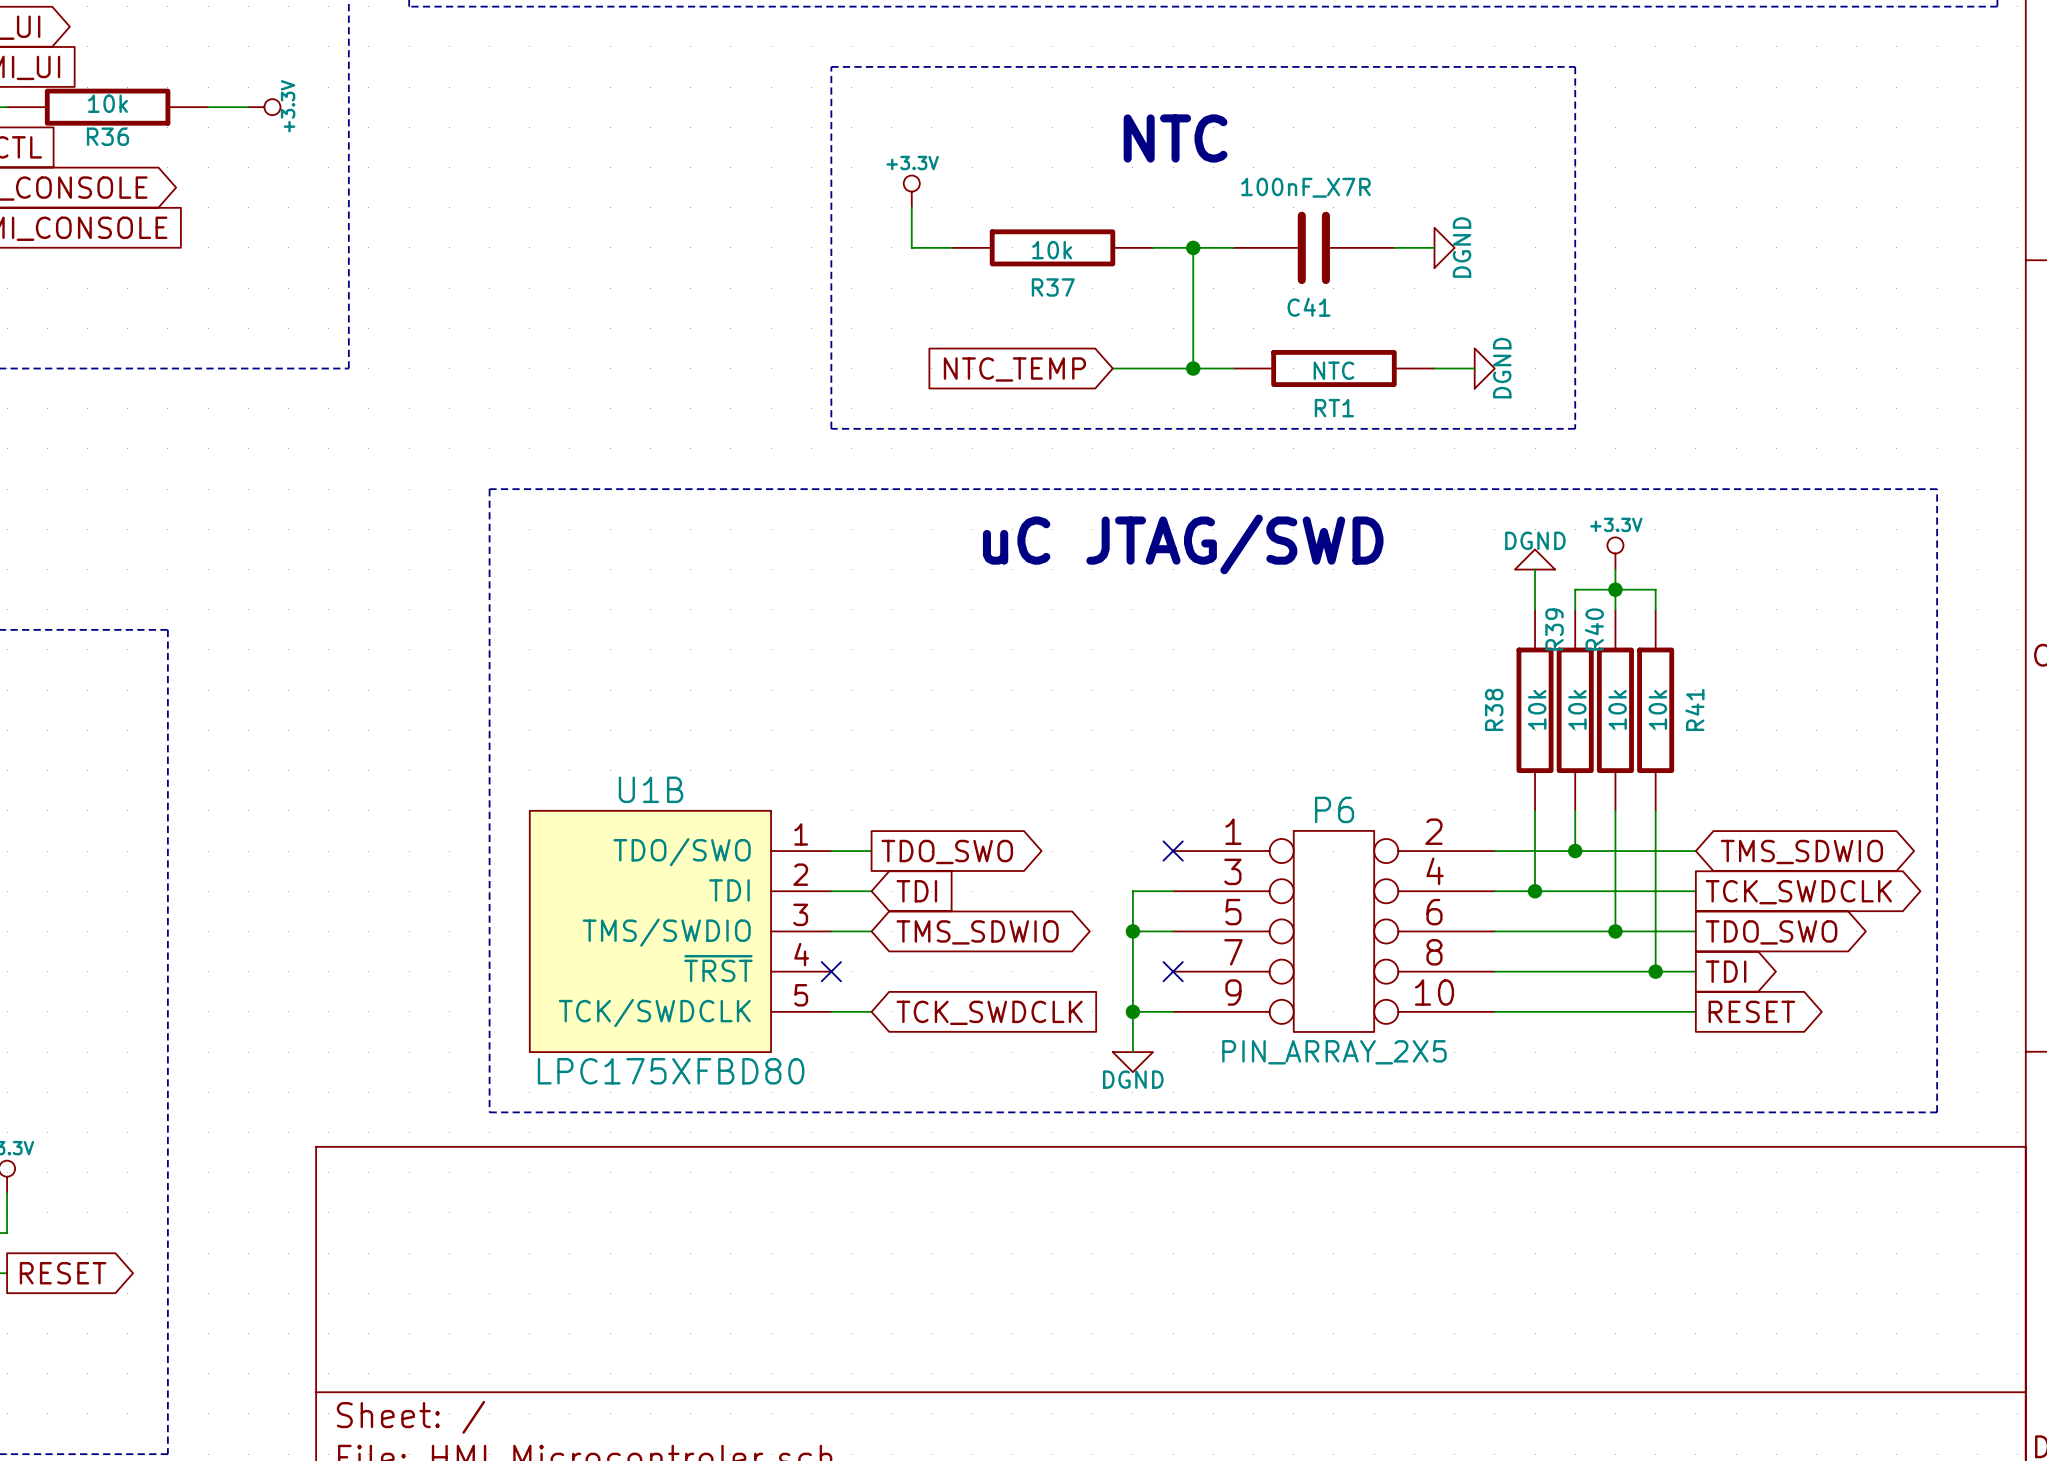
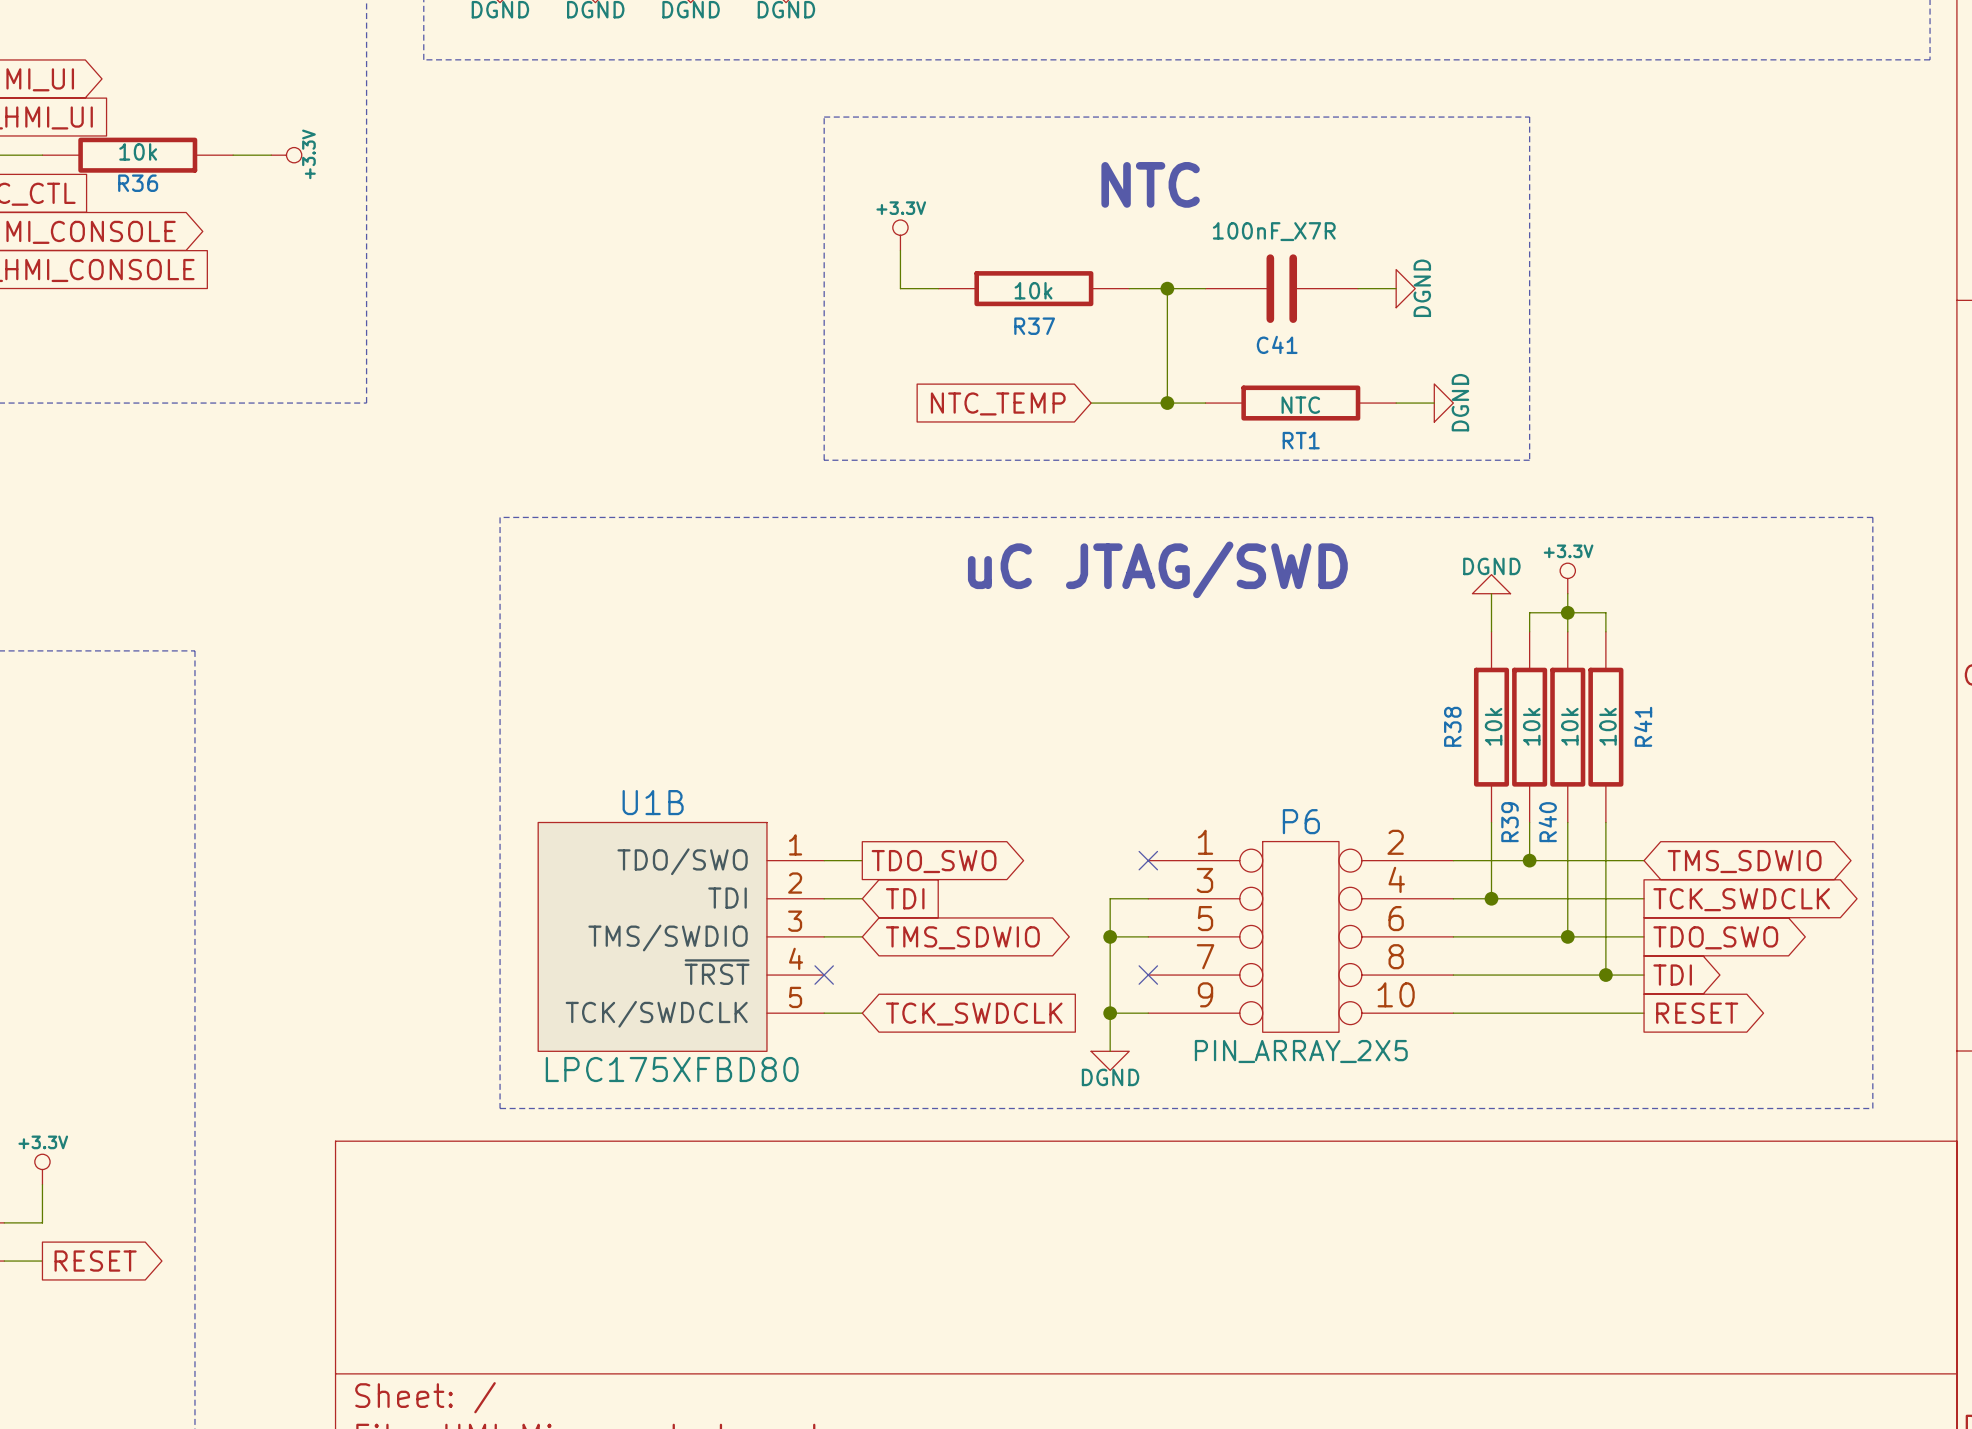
R39 name position: R39 (1554, 629) -> R39 (1509, 822)
R40 name position: R40 (1594, 629) -> R40 (1547, 822)

